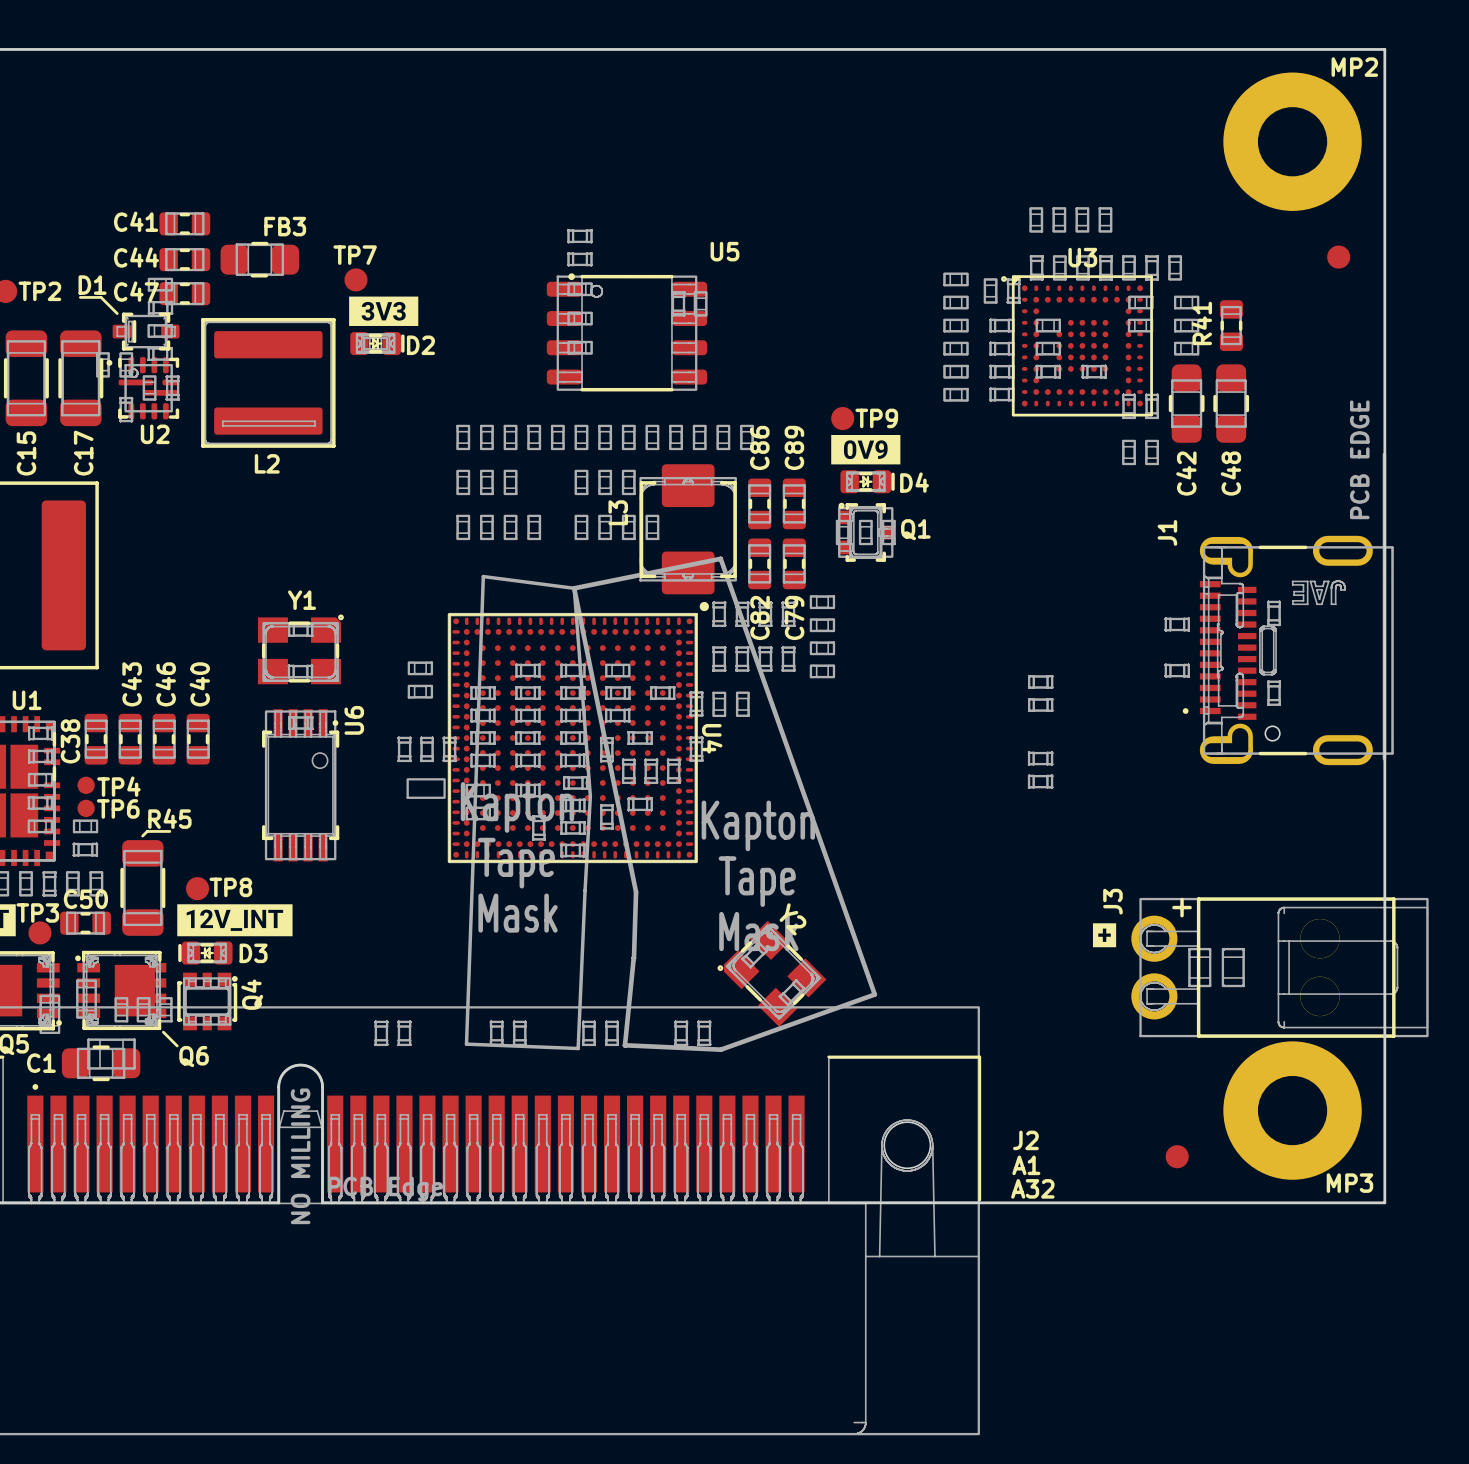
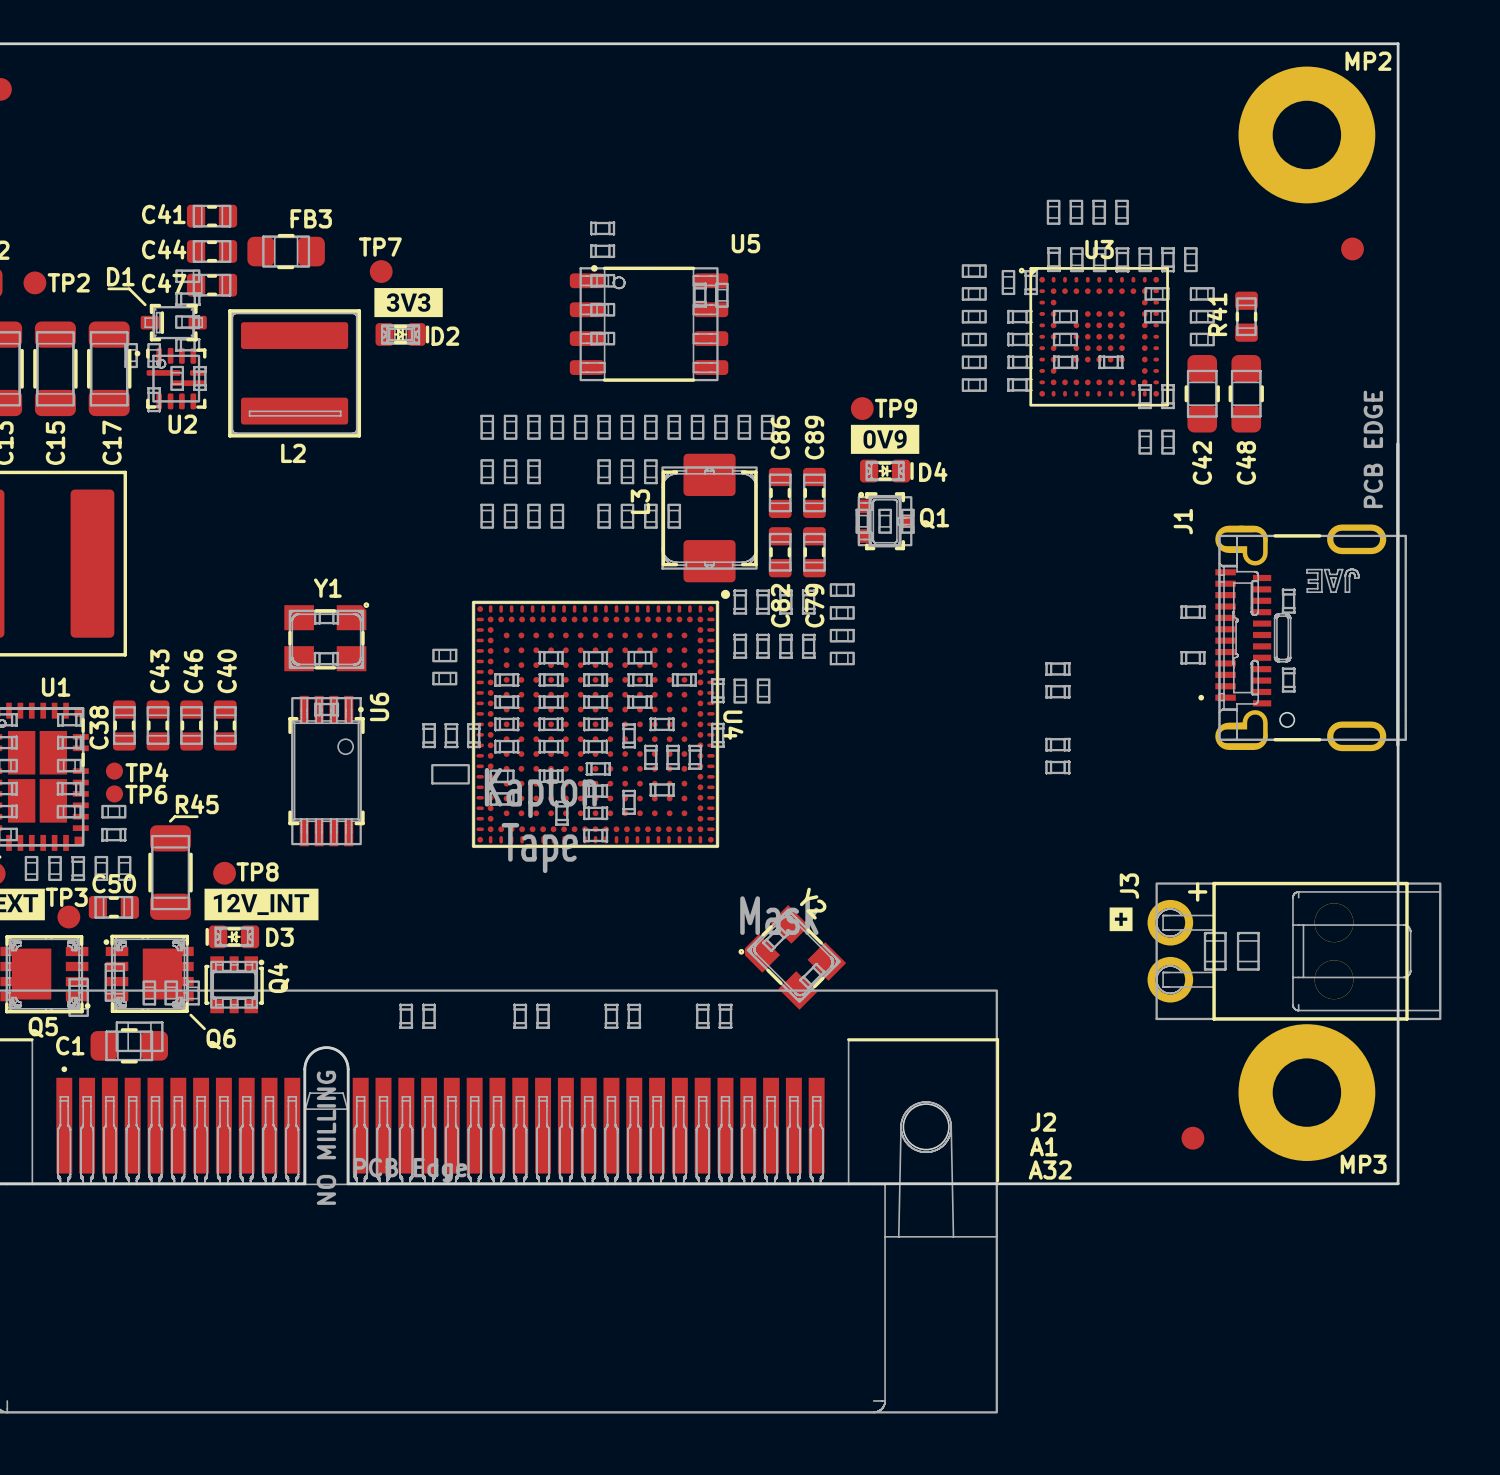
line: (574, 588) (483, 576) (466, 1044) (578, 1048) (590, 796) (574, 588) -> none
line: (574, 588) (720, 558) (874, 994) (720, 1049) (624, 1045) -> none
line: (574, 588) (636, 892) (633, 958) -> none
text: Kapton (758, 825) -> none
text: Tape (757, 881) -> none
text: Mask (518, 913) -> none
line: (633, 958) (624, 1045) -> none

